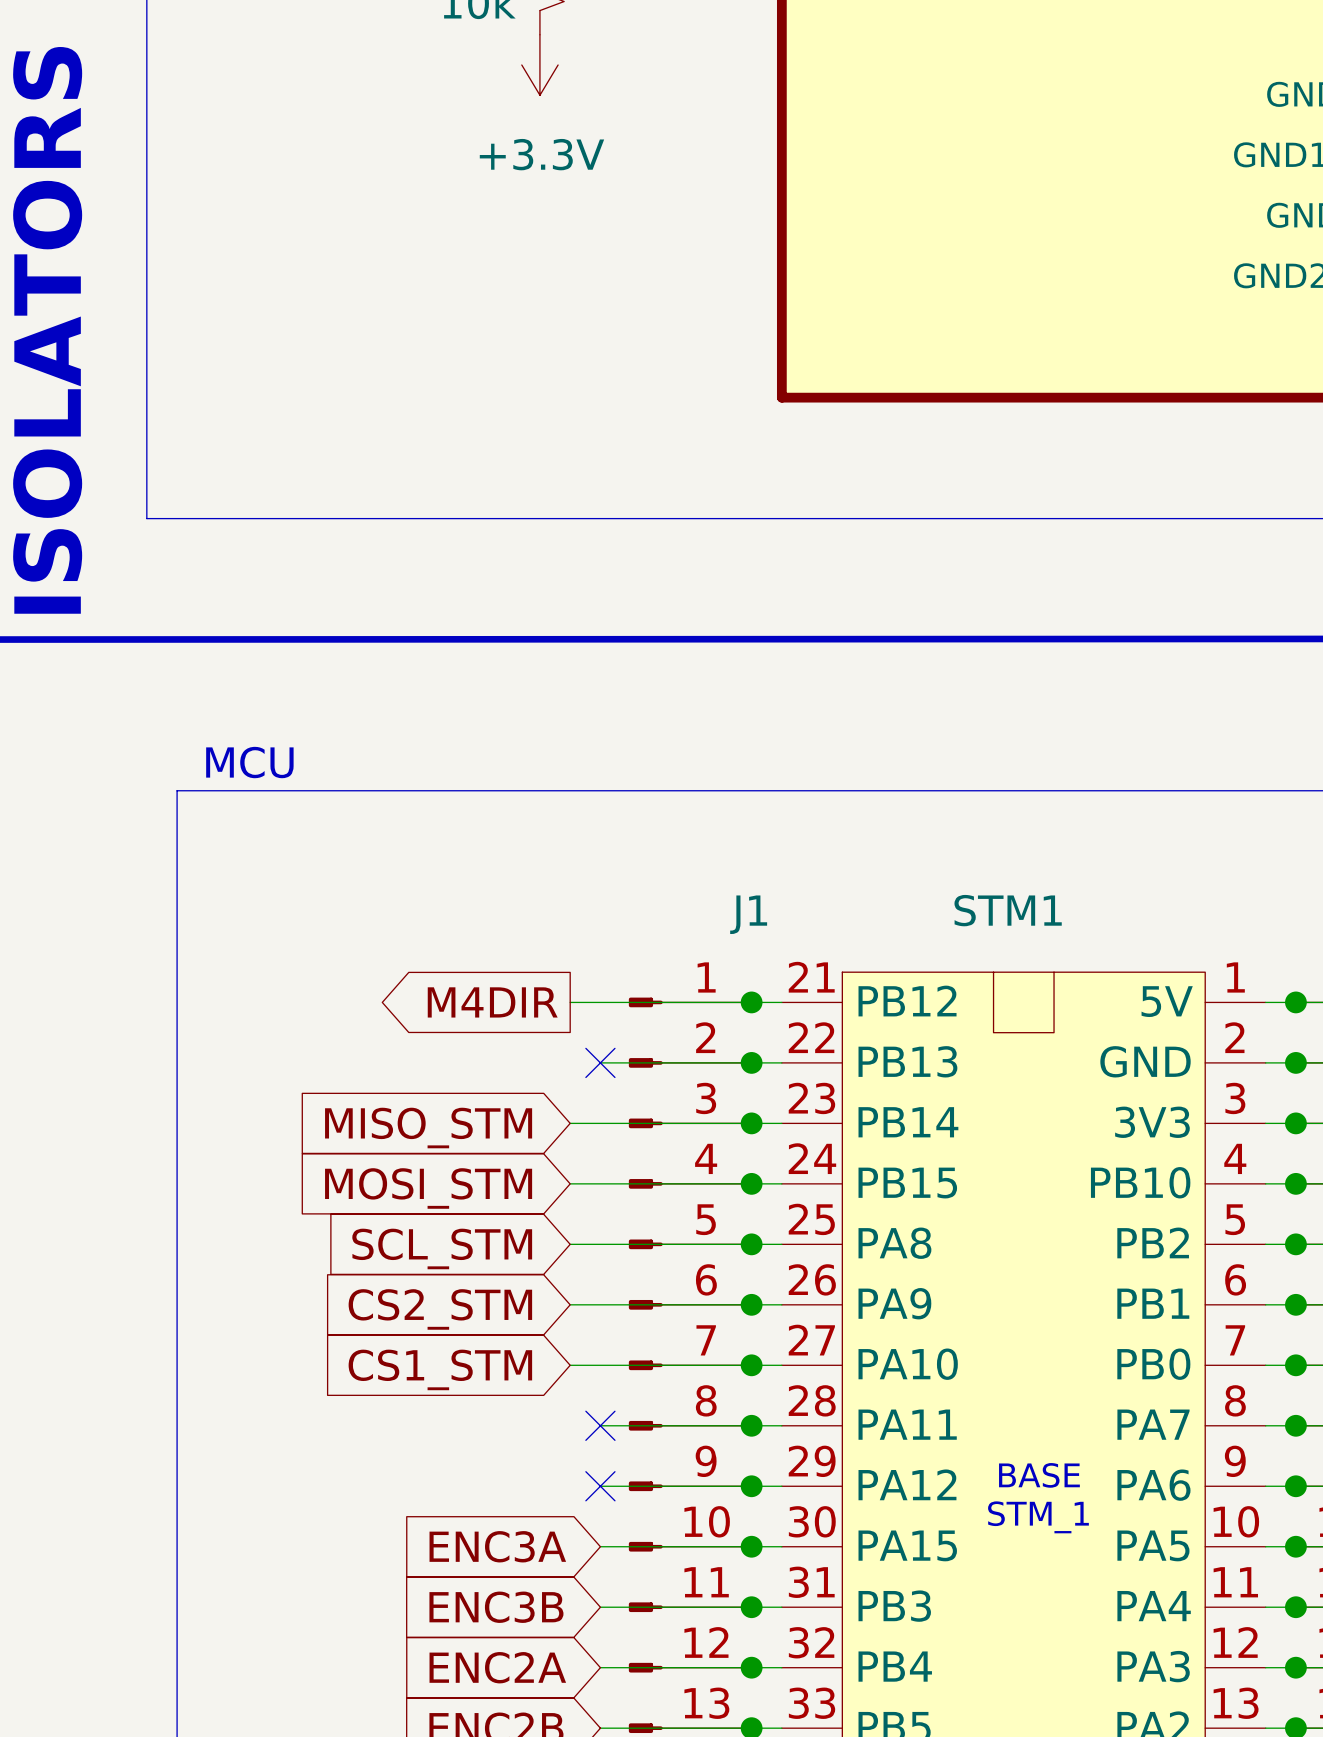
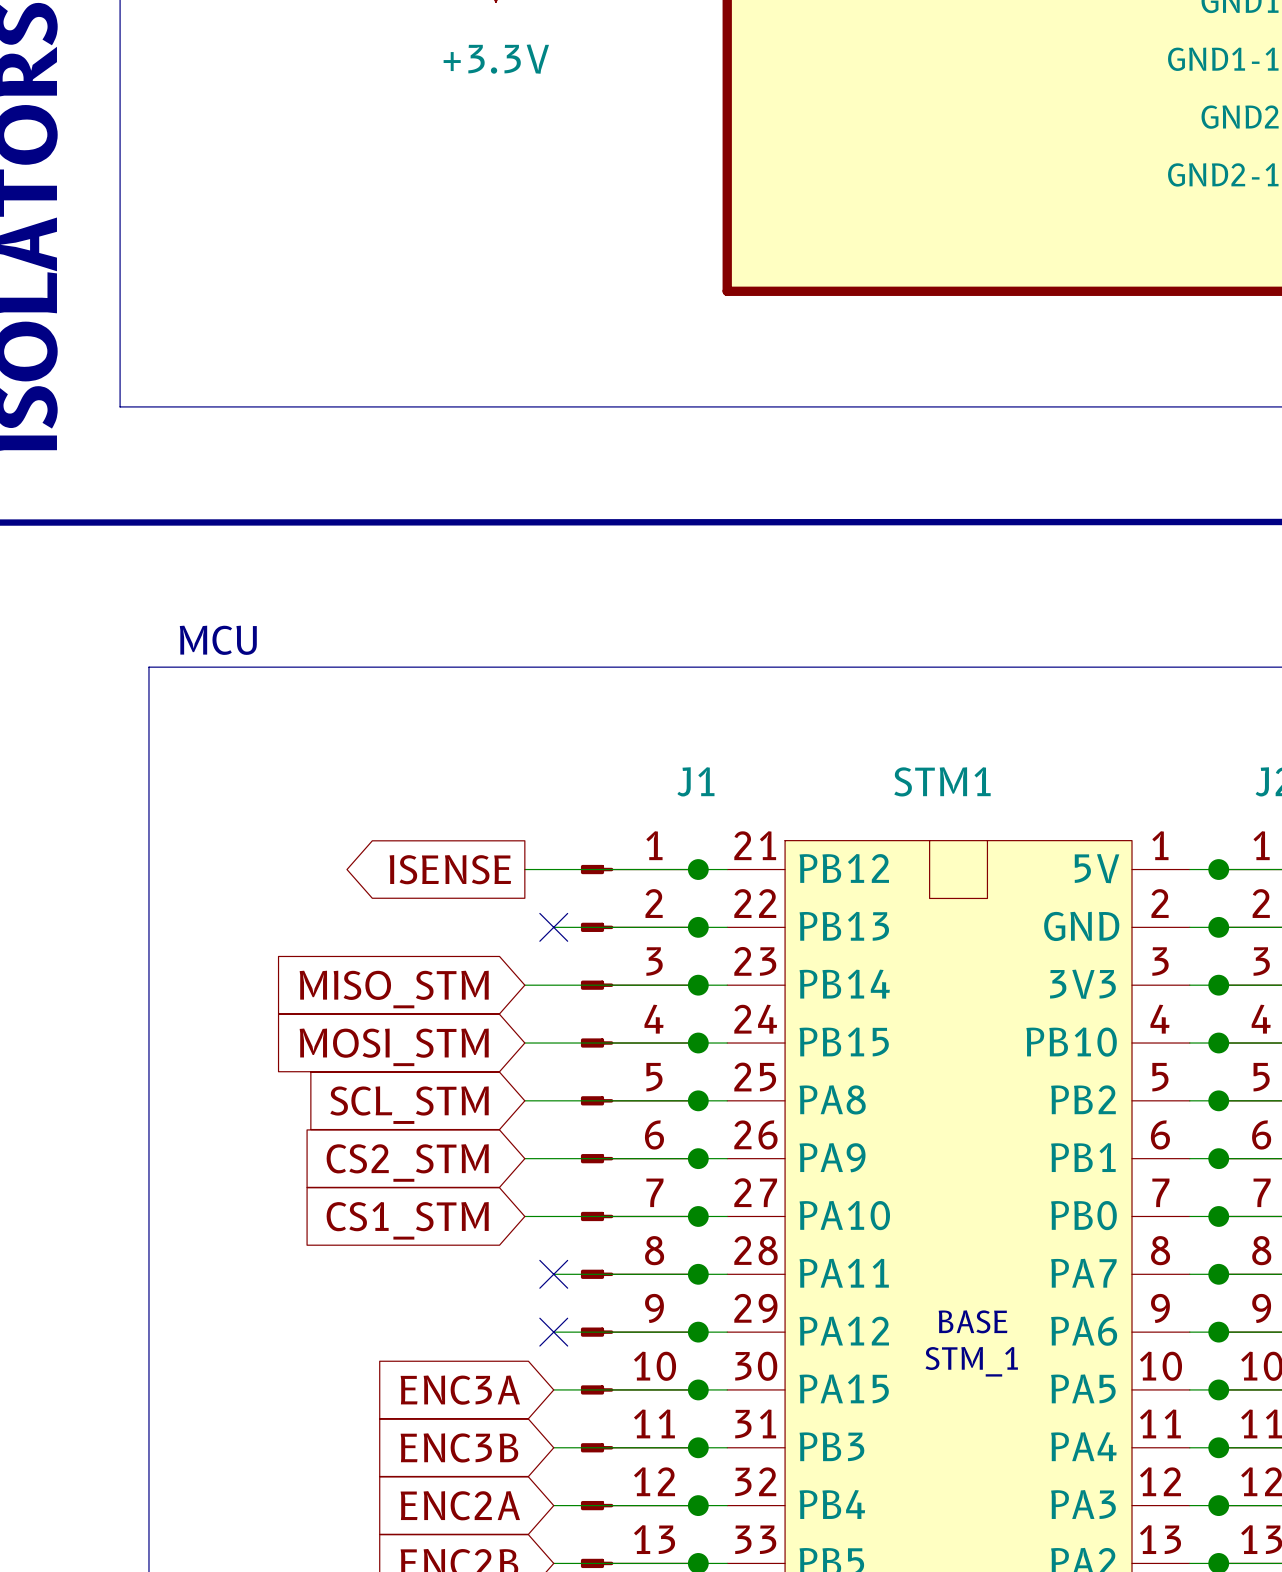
global label: M4DIR (492, 1002) -> ISENSE (450, 869)

